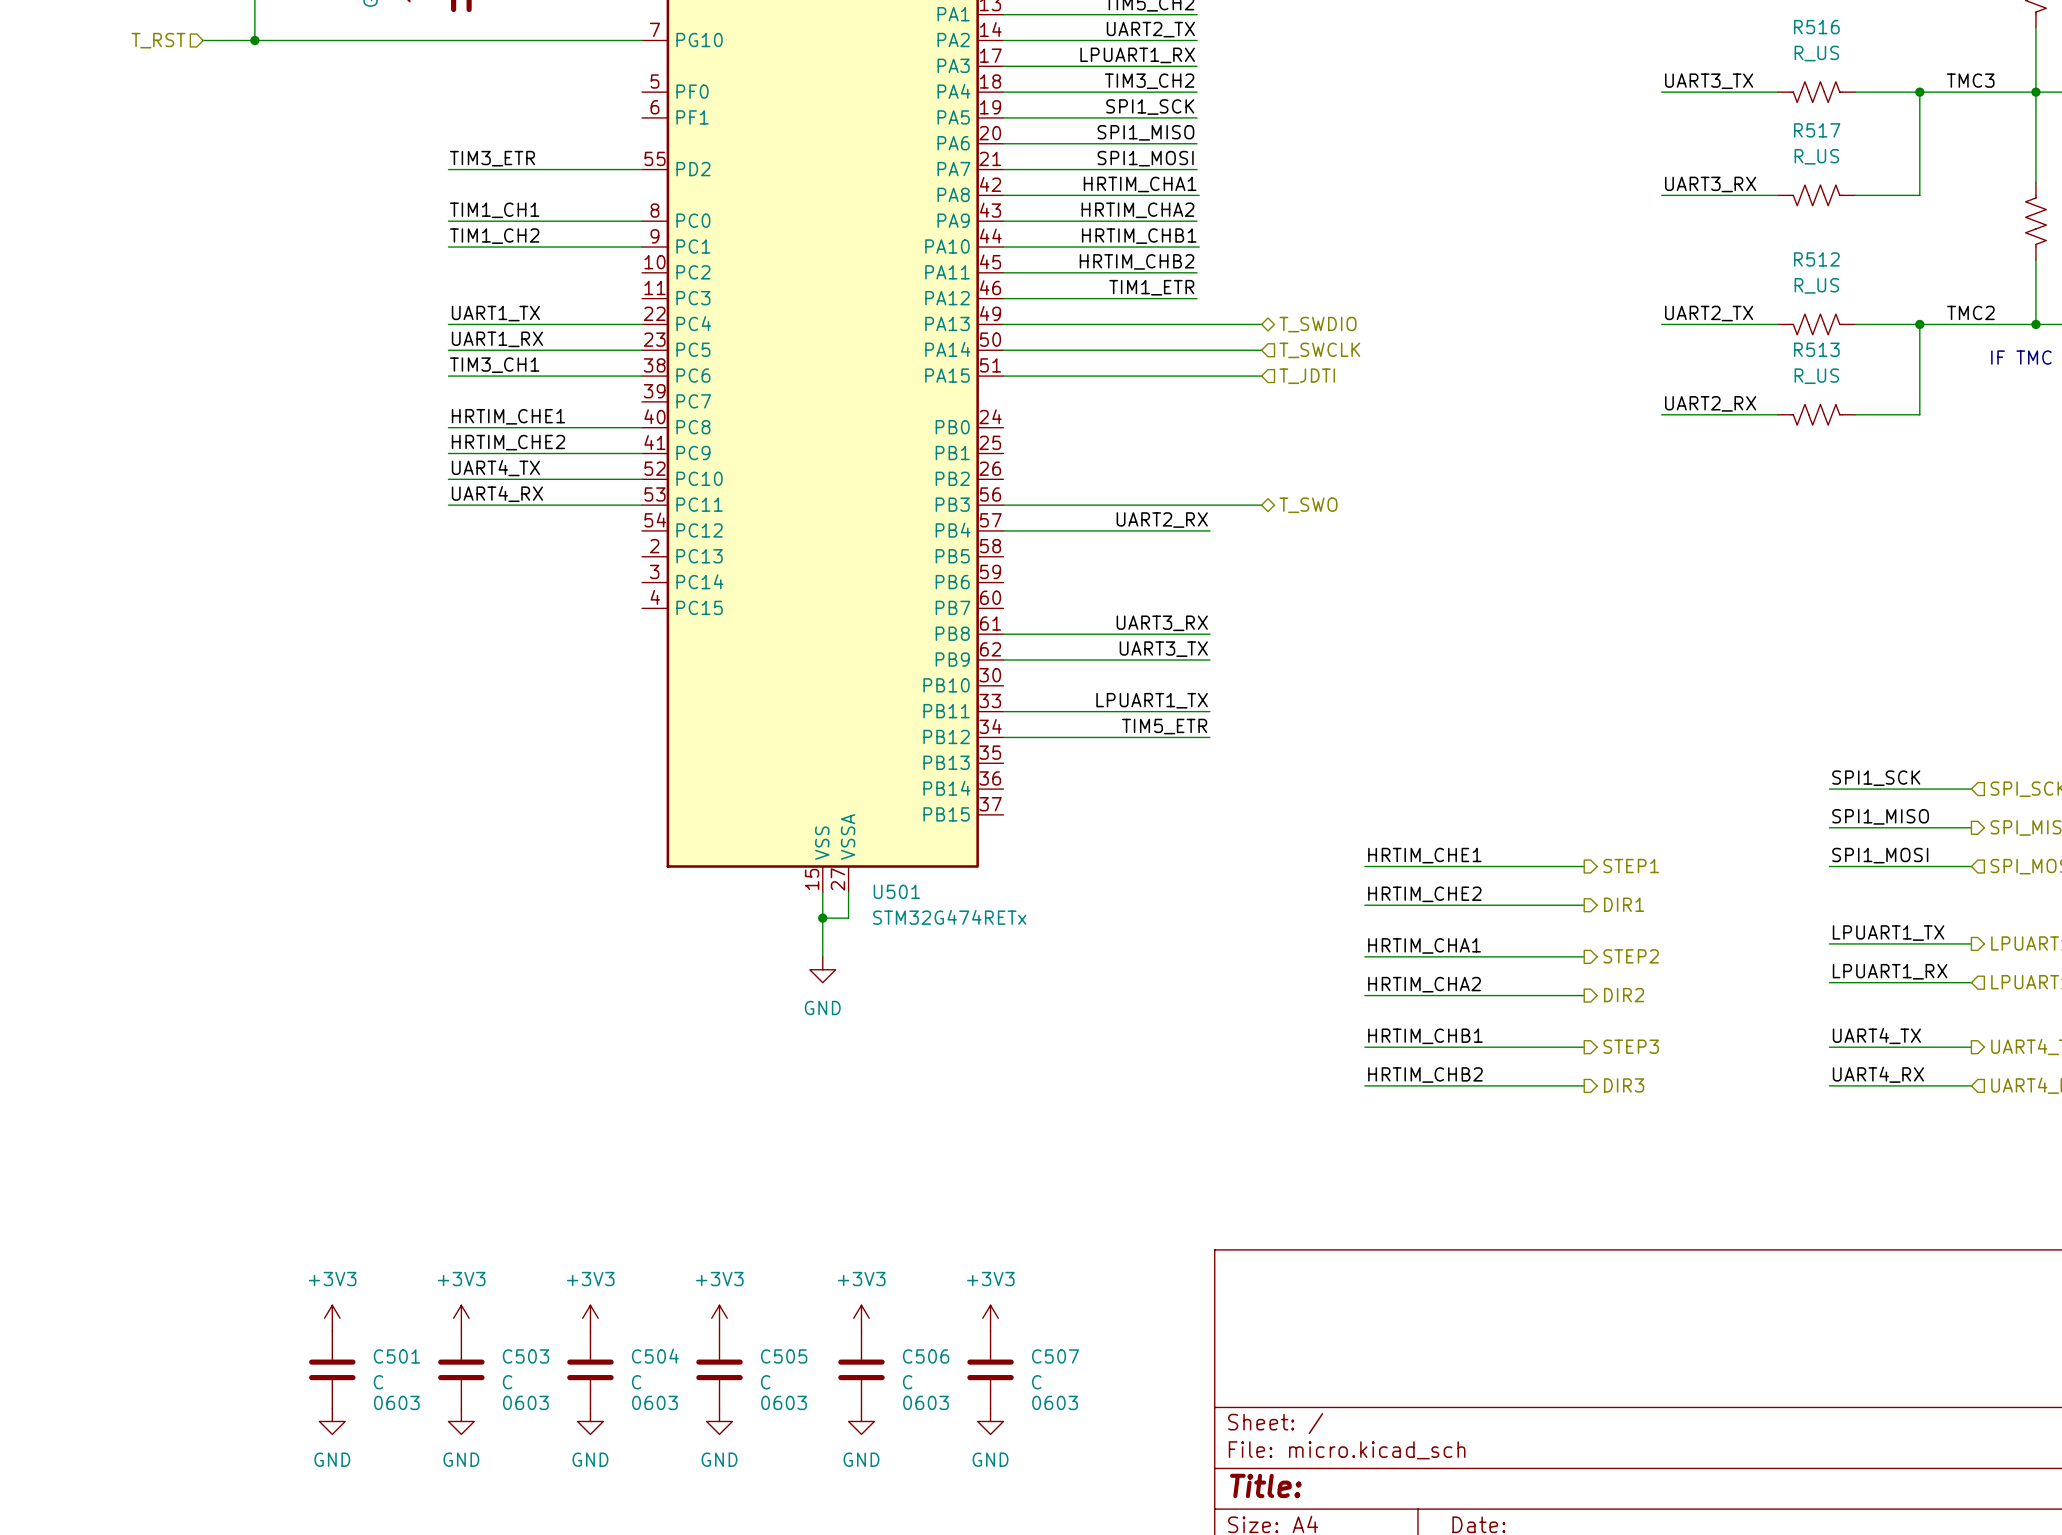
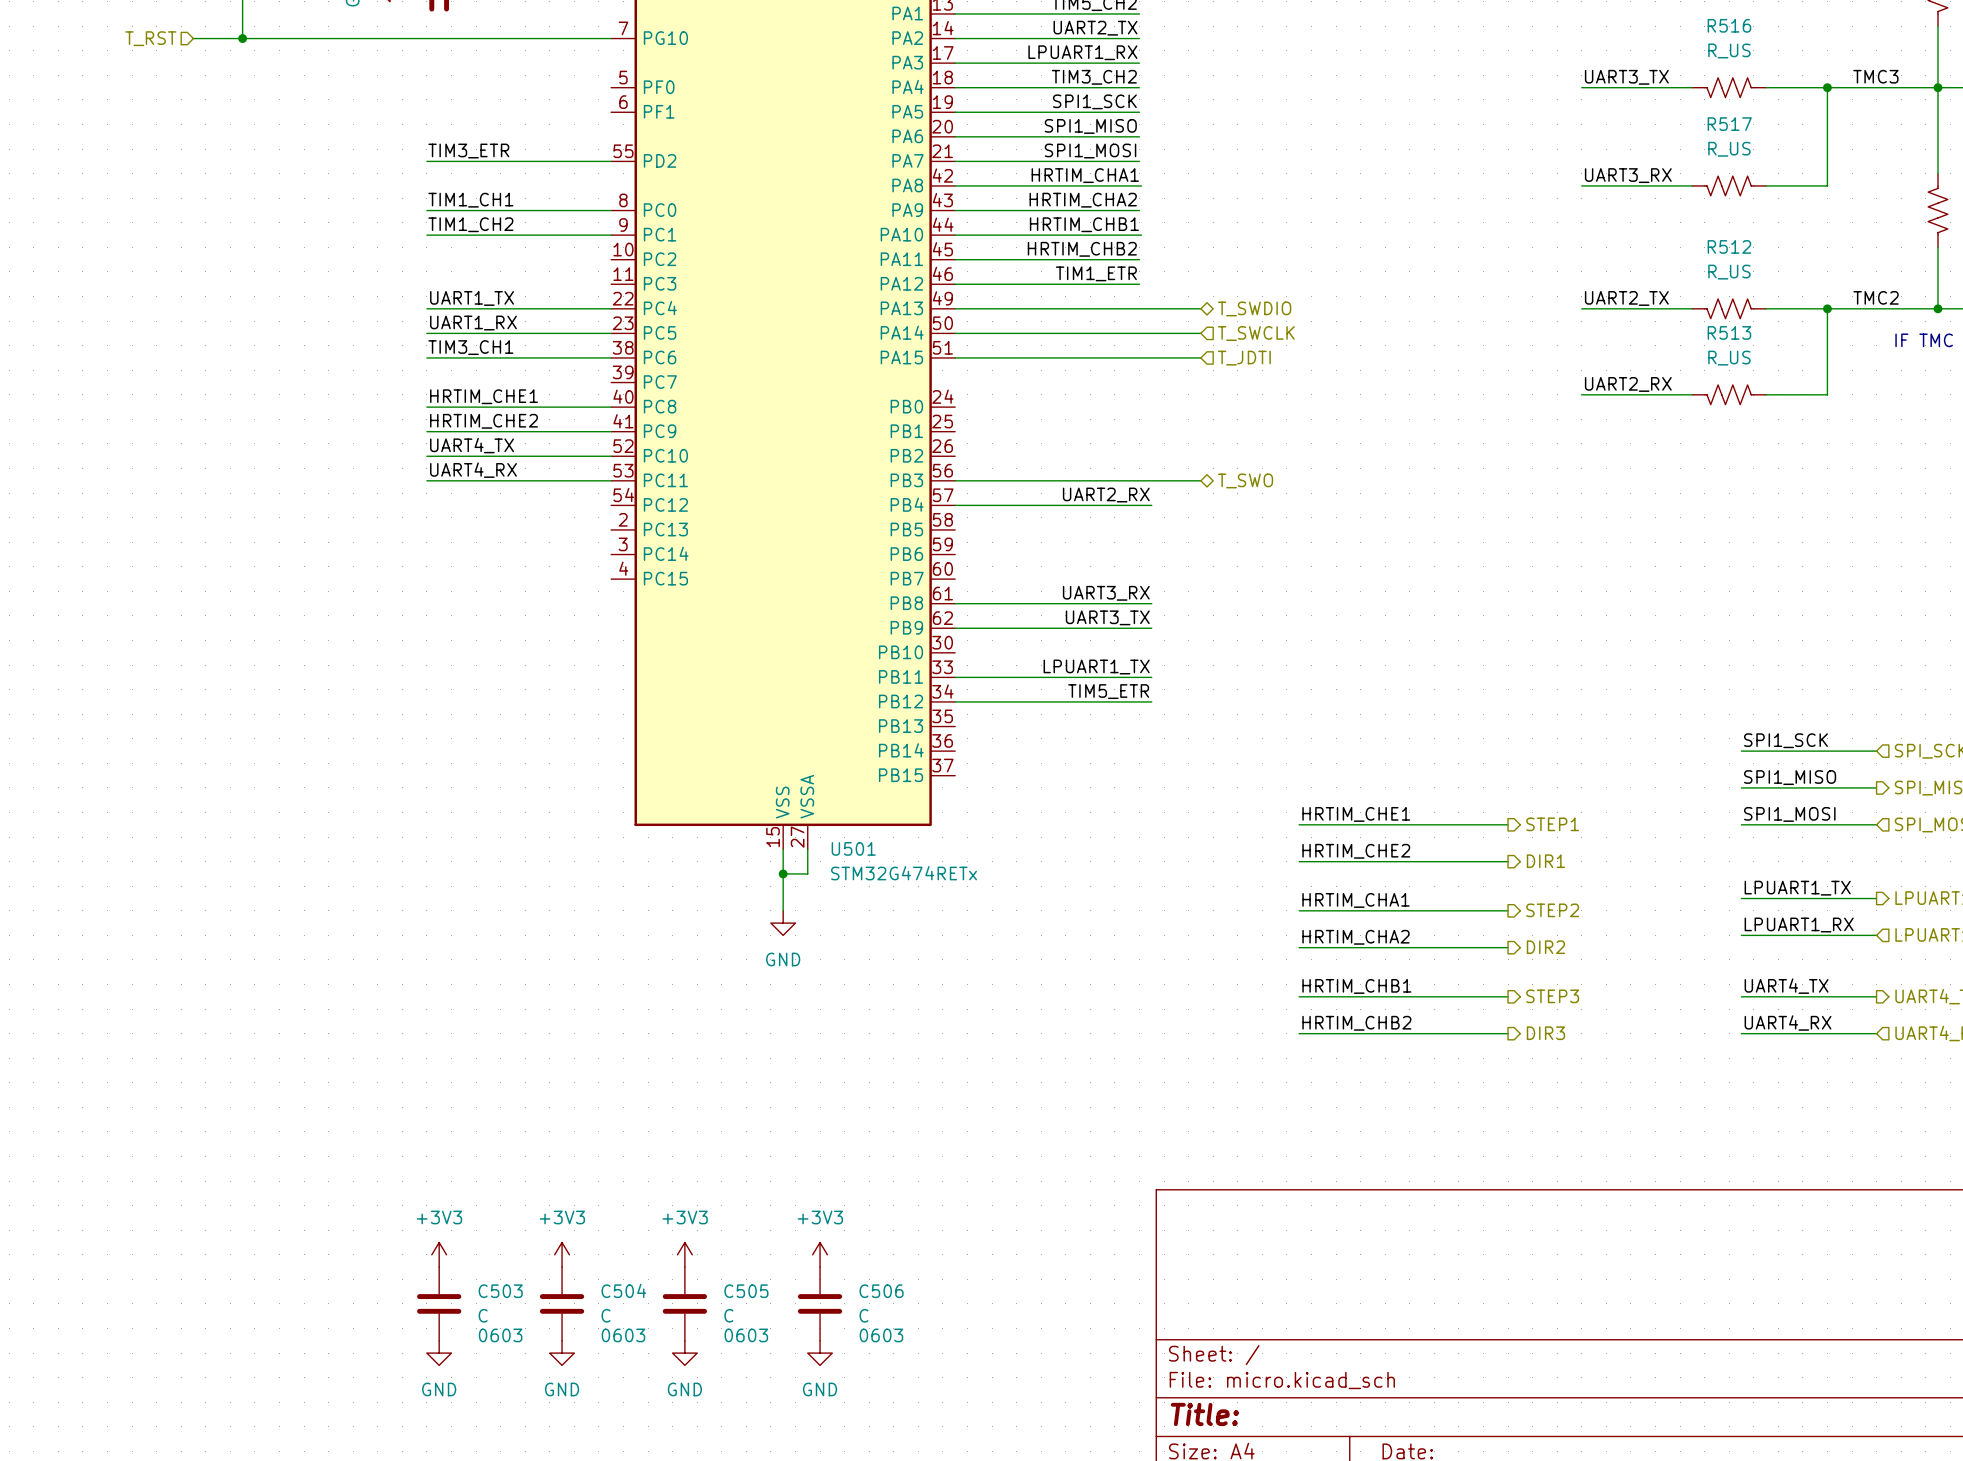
power symbol: +3V3 (332, 1318) -> none
power symbol: +3V3 (990, 1318) -> none
C501: C (332, 1369) -> none
C507: C (990, 1369) -> none
power symbol: GND (332, 1421) -> none
power symbol: GND (990, 1421) -> none

